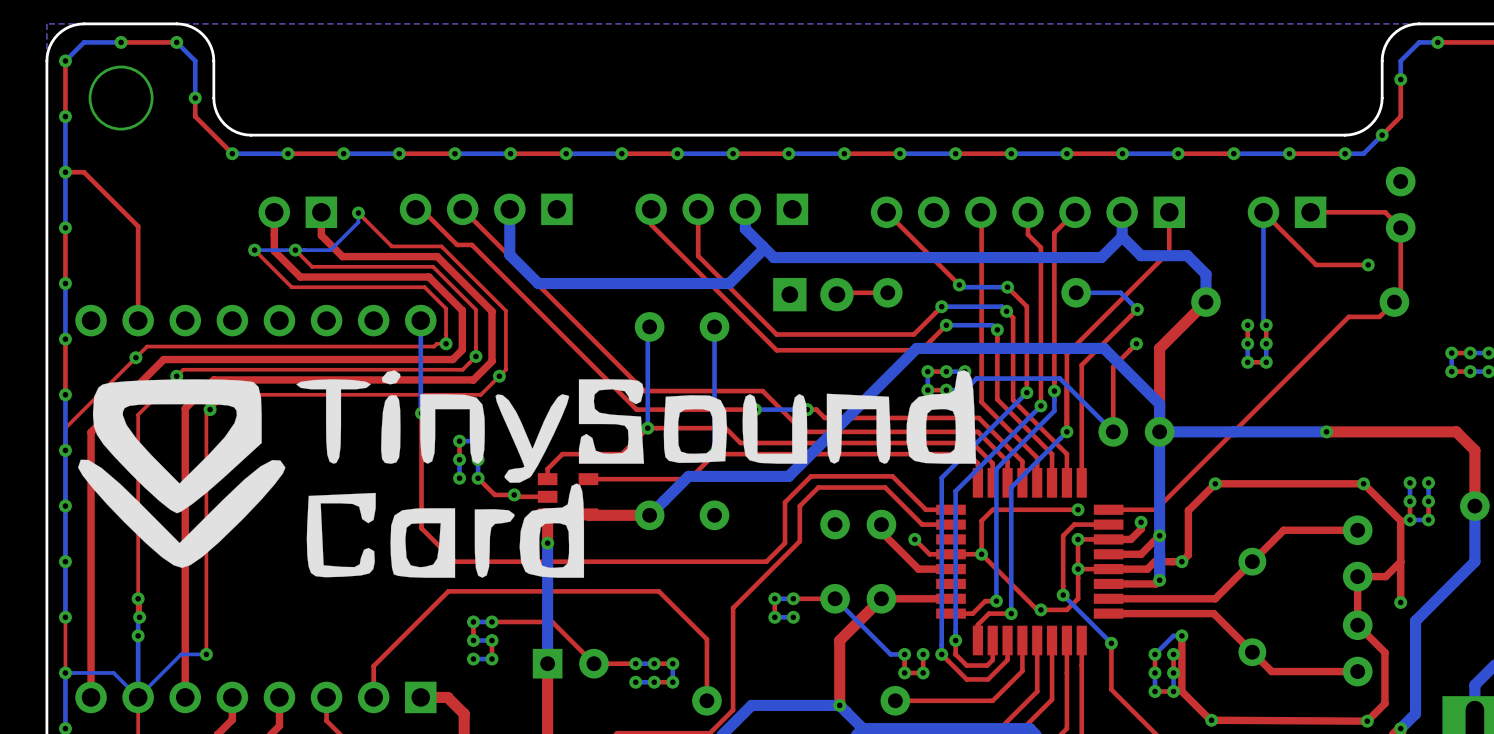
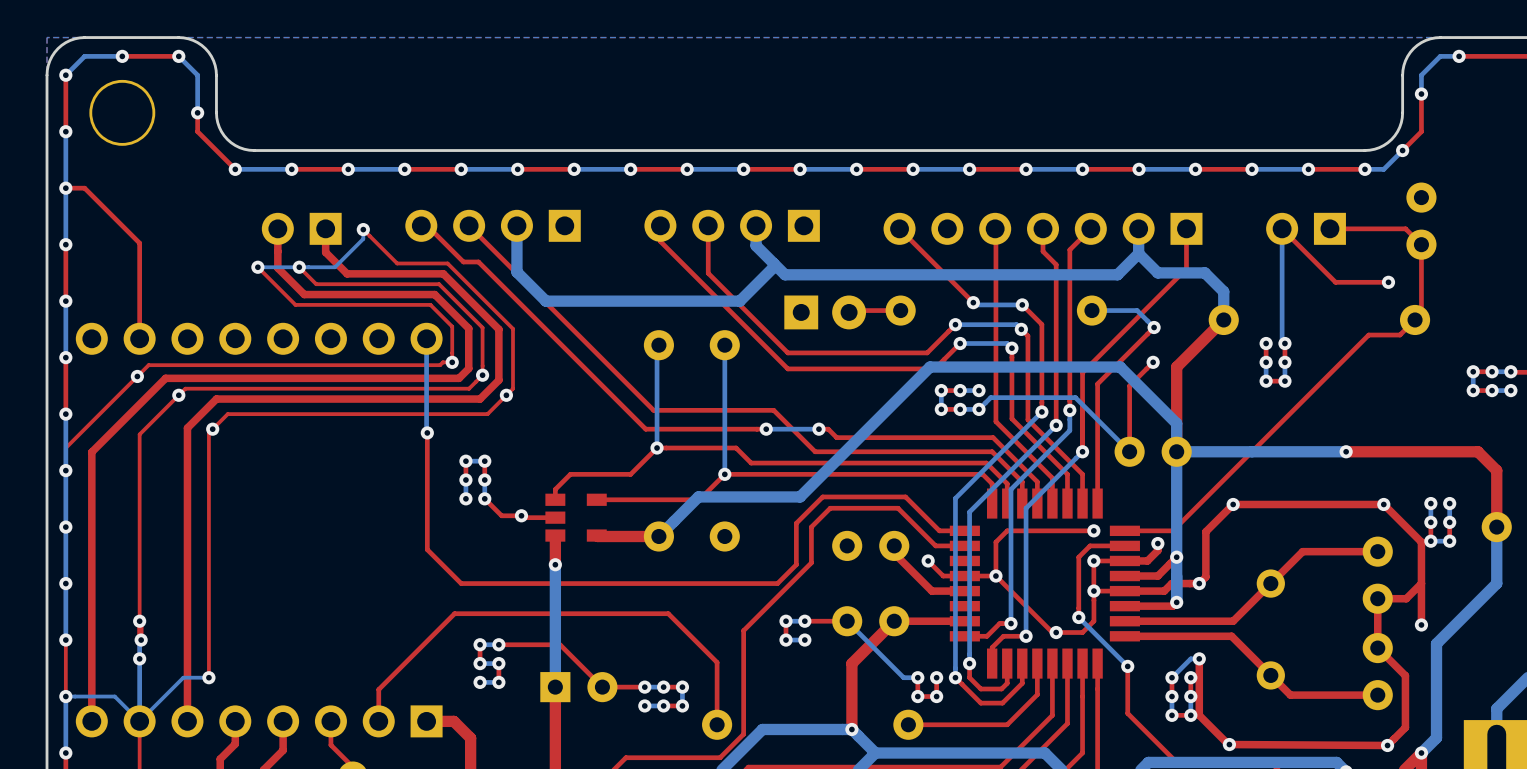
drawing: [78, 370, 977, 578] -> none

